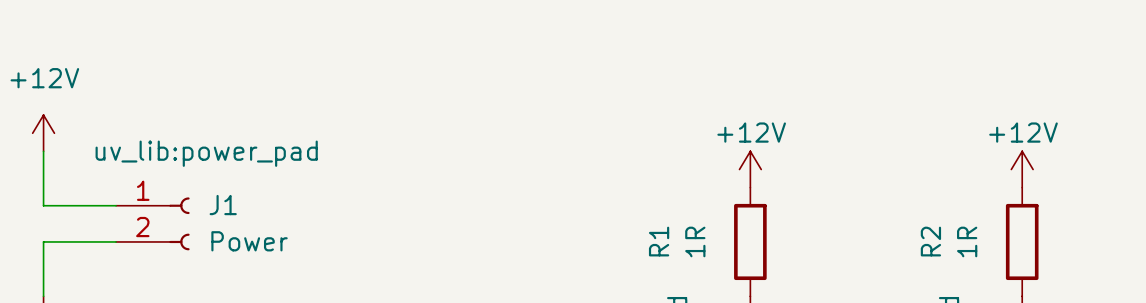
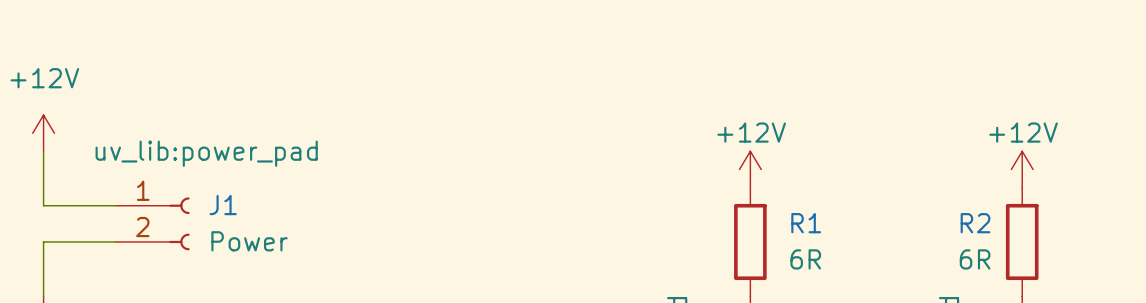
R1 name rotation: 0° (659, 241) -> 90° clockwise (806, 223)
R1 name position: R1 (659, 241) -> R1 (806, 223)
R1 value: 1R (695, 241) -> 6R (805, 259)
R2 name rotation: 0° (930, 241) -> 90° clockwise (975, 223)
R2 name position: R2 (930, 241) -> R2 (975, 223)
R2 value: 1R (967, 241) -> 6R (975, 259)

